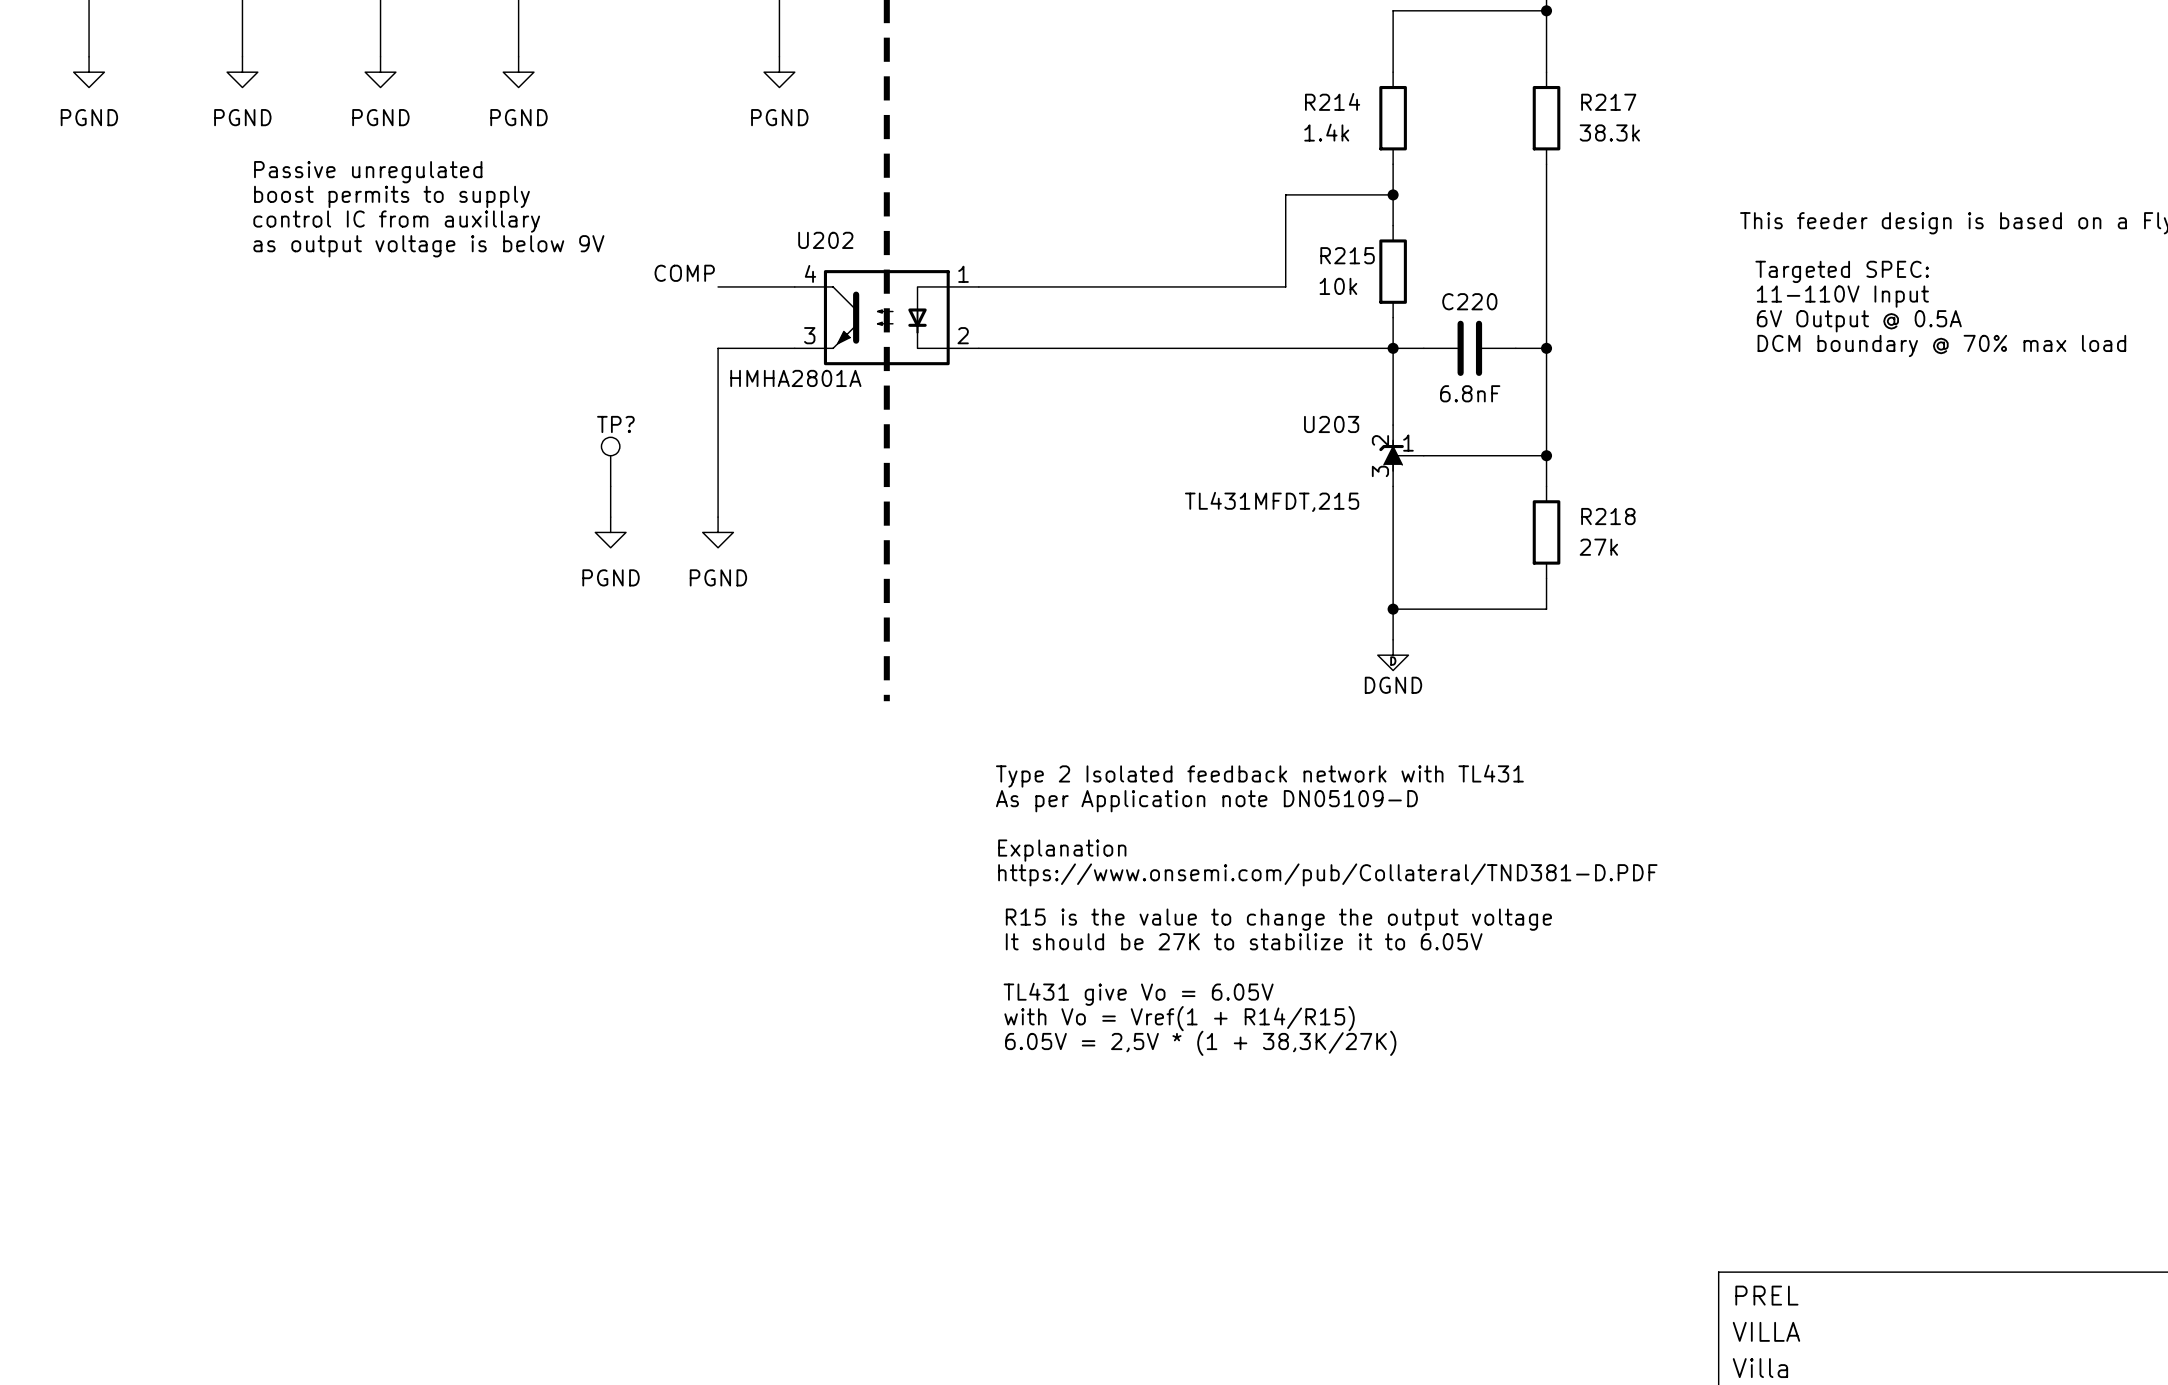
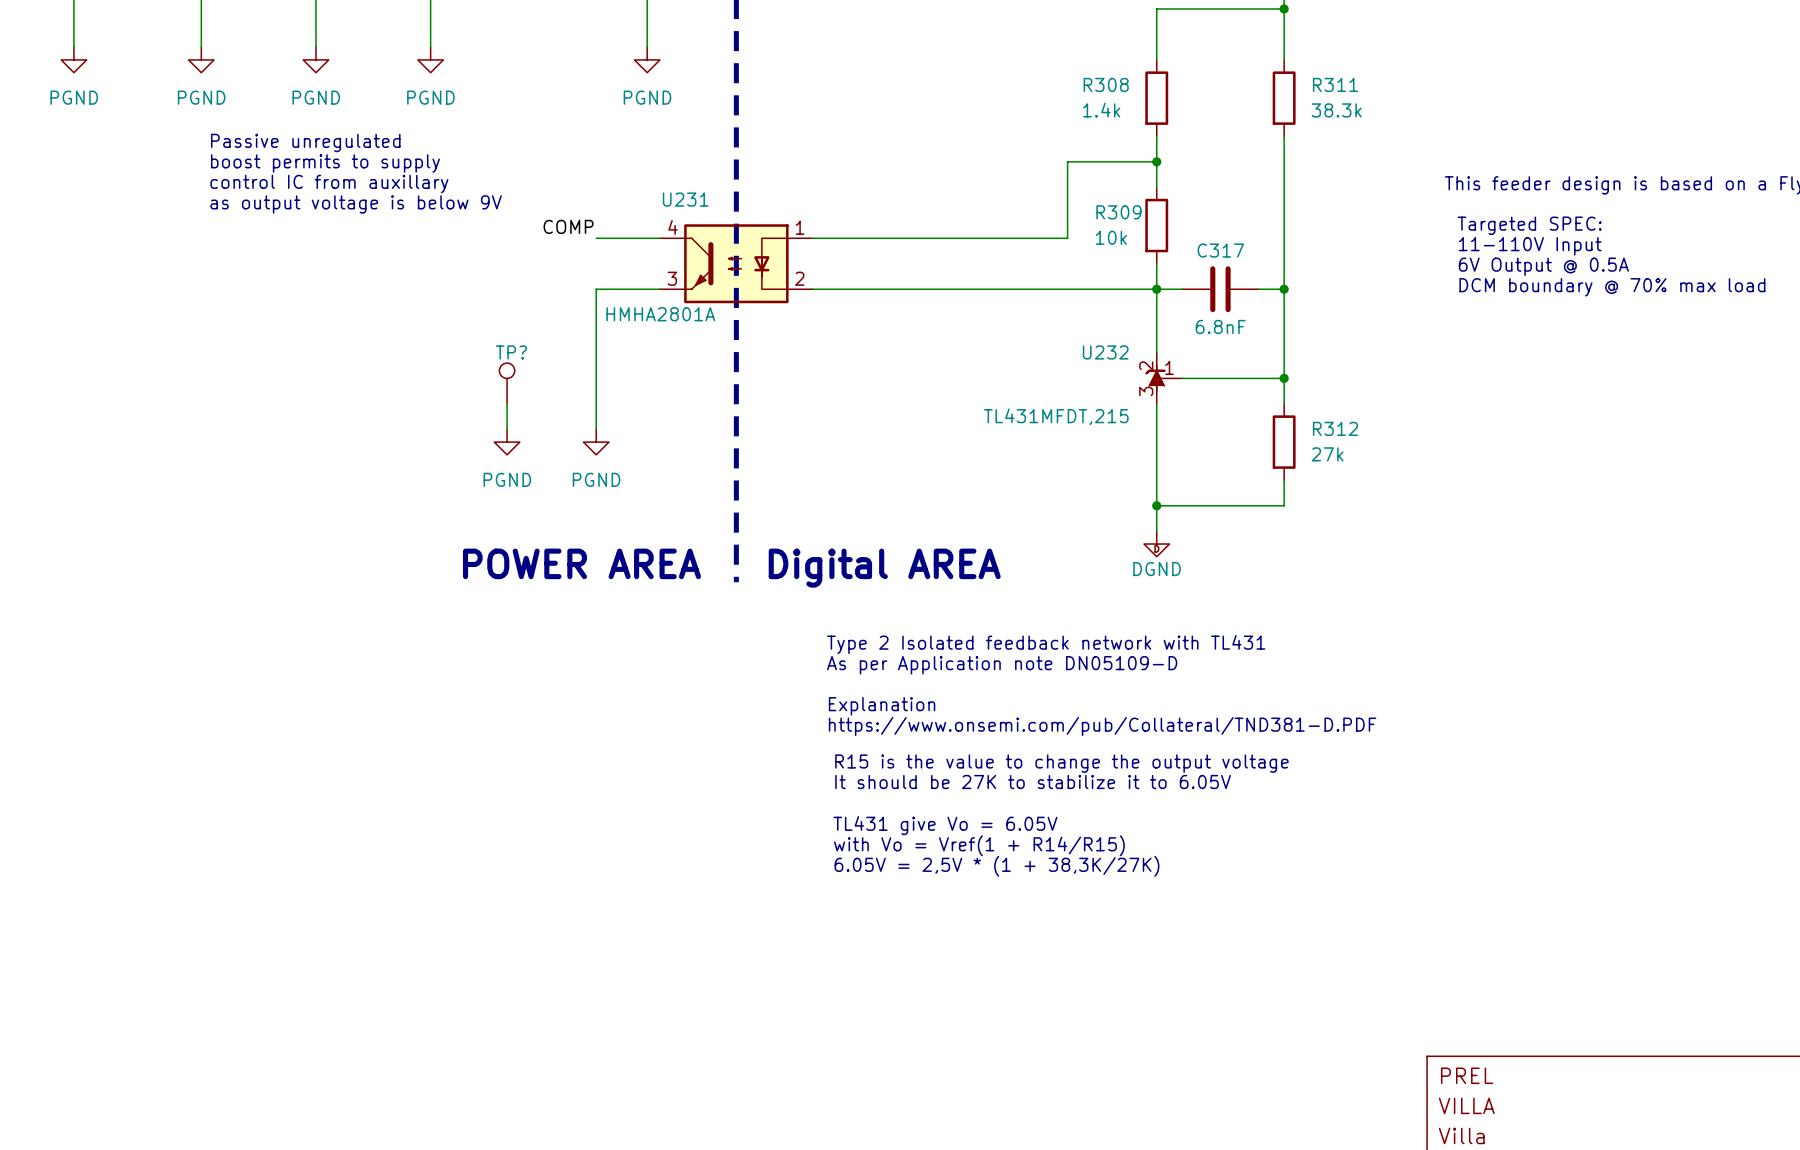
R214 name: R214 (1332, 101) -> R308 (1106, 84)
R217 name: R217 (1608, 102) -> R311 (1335, 84)
U202 name: U202 (825, 240) -> U231 (685, 199)
R215 name: R215 (1347, 255) -> R309 (1118, 212)
C220 name: C220 (1469, 301) -> C317 (1220, 250)
U203 name: U203 (1331, 424) -> U232 (1105, 352)
R218 name: R218 (1608, 516) -> R312 (1335, 428)
text: none -> POWER AREA (581, 563)
text: none -> Digital AREA (884, 568)

